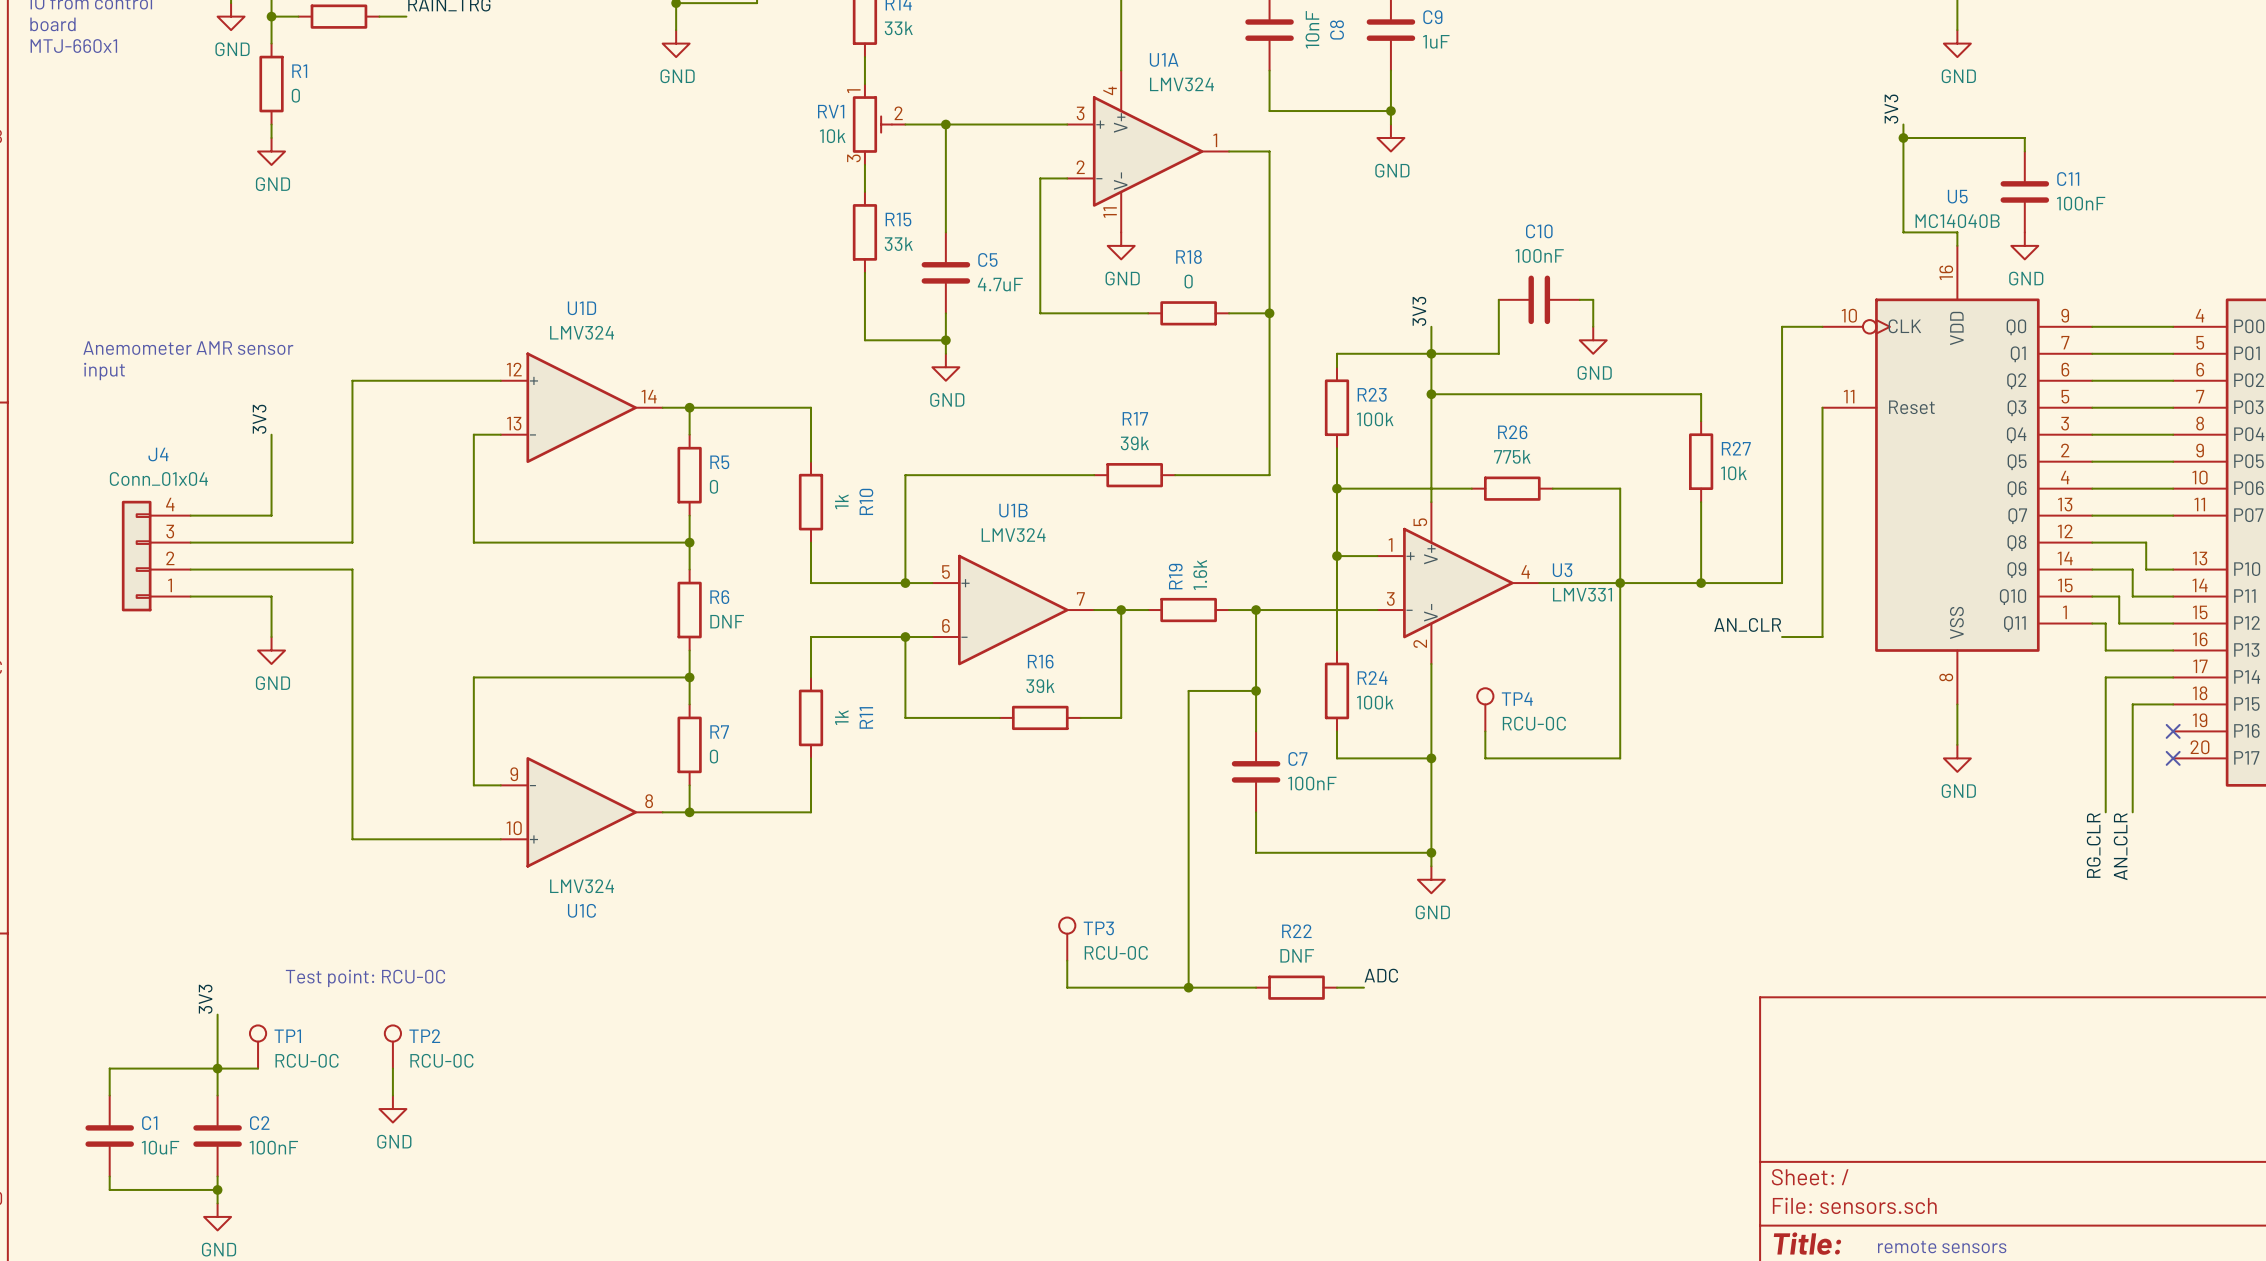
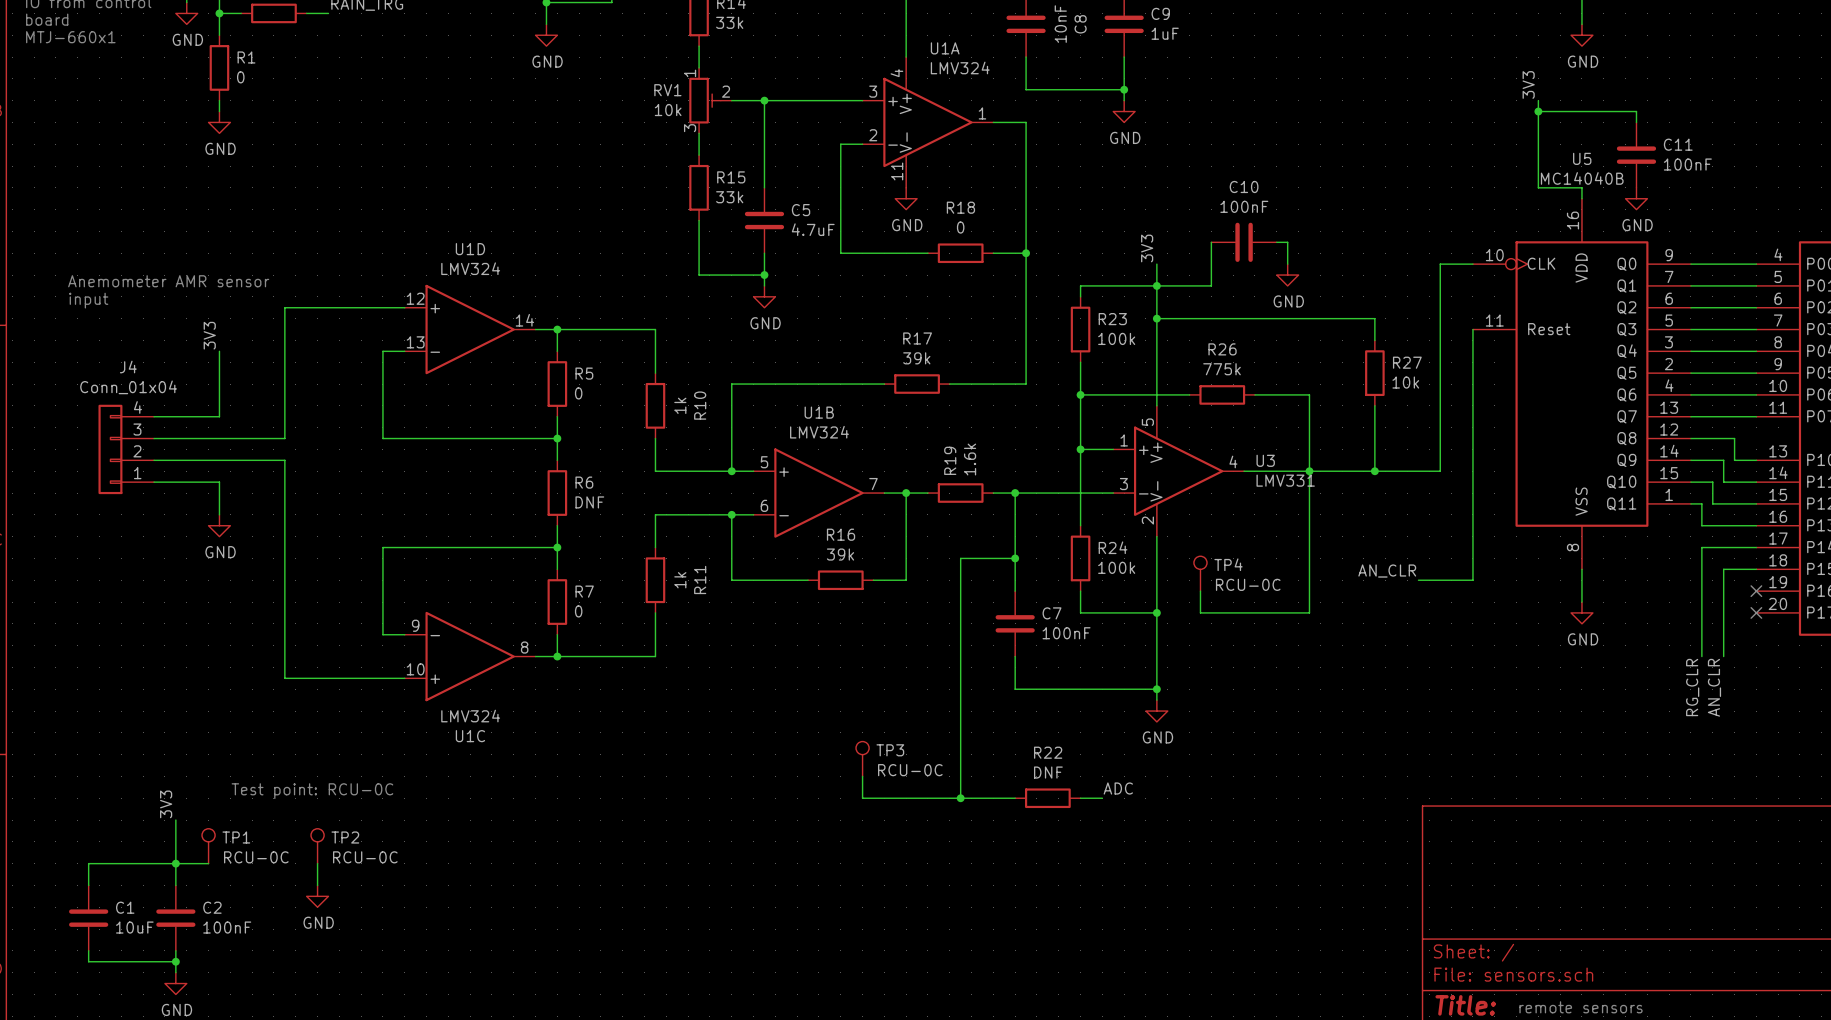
label position: AN_CLR (1747, 624) -> AN_CLR (1387, 571)
wire: (1782, 637) (1822, 637) -> (1418, 580) (1472, 580) (1472, 514)

